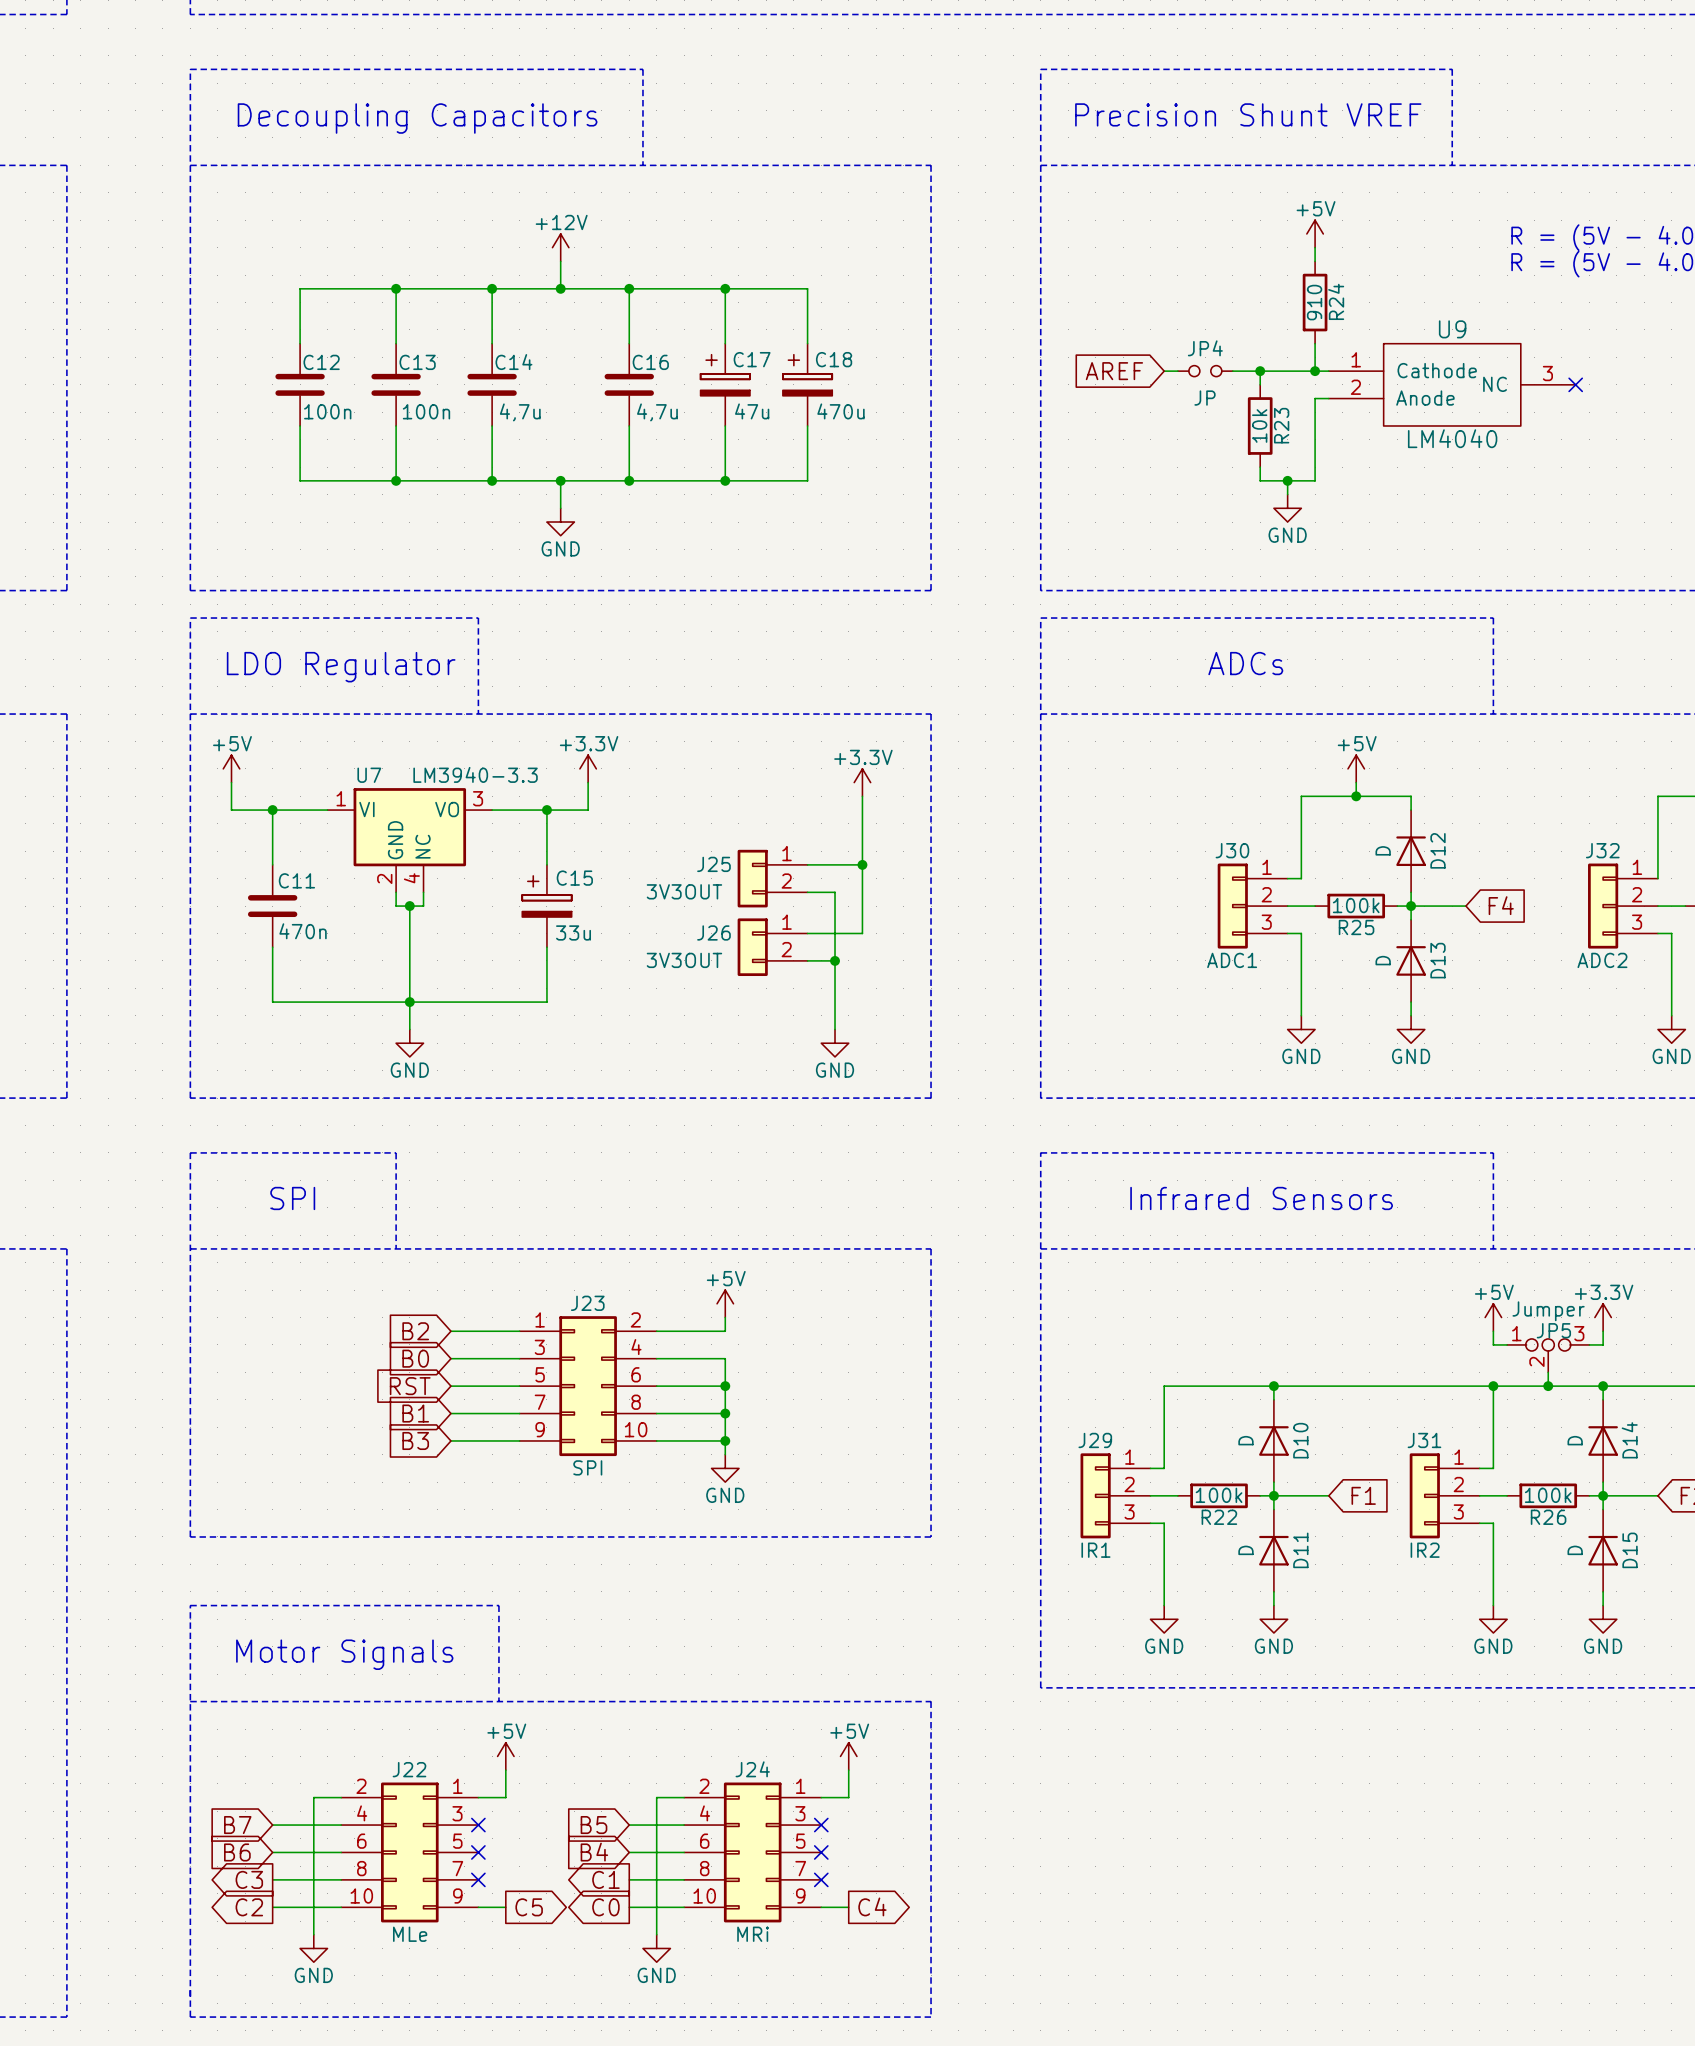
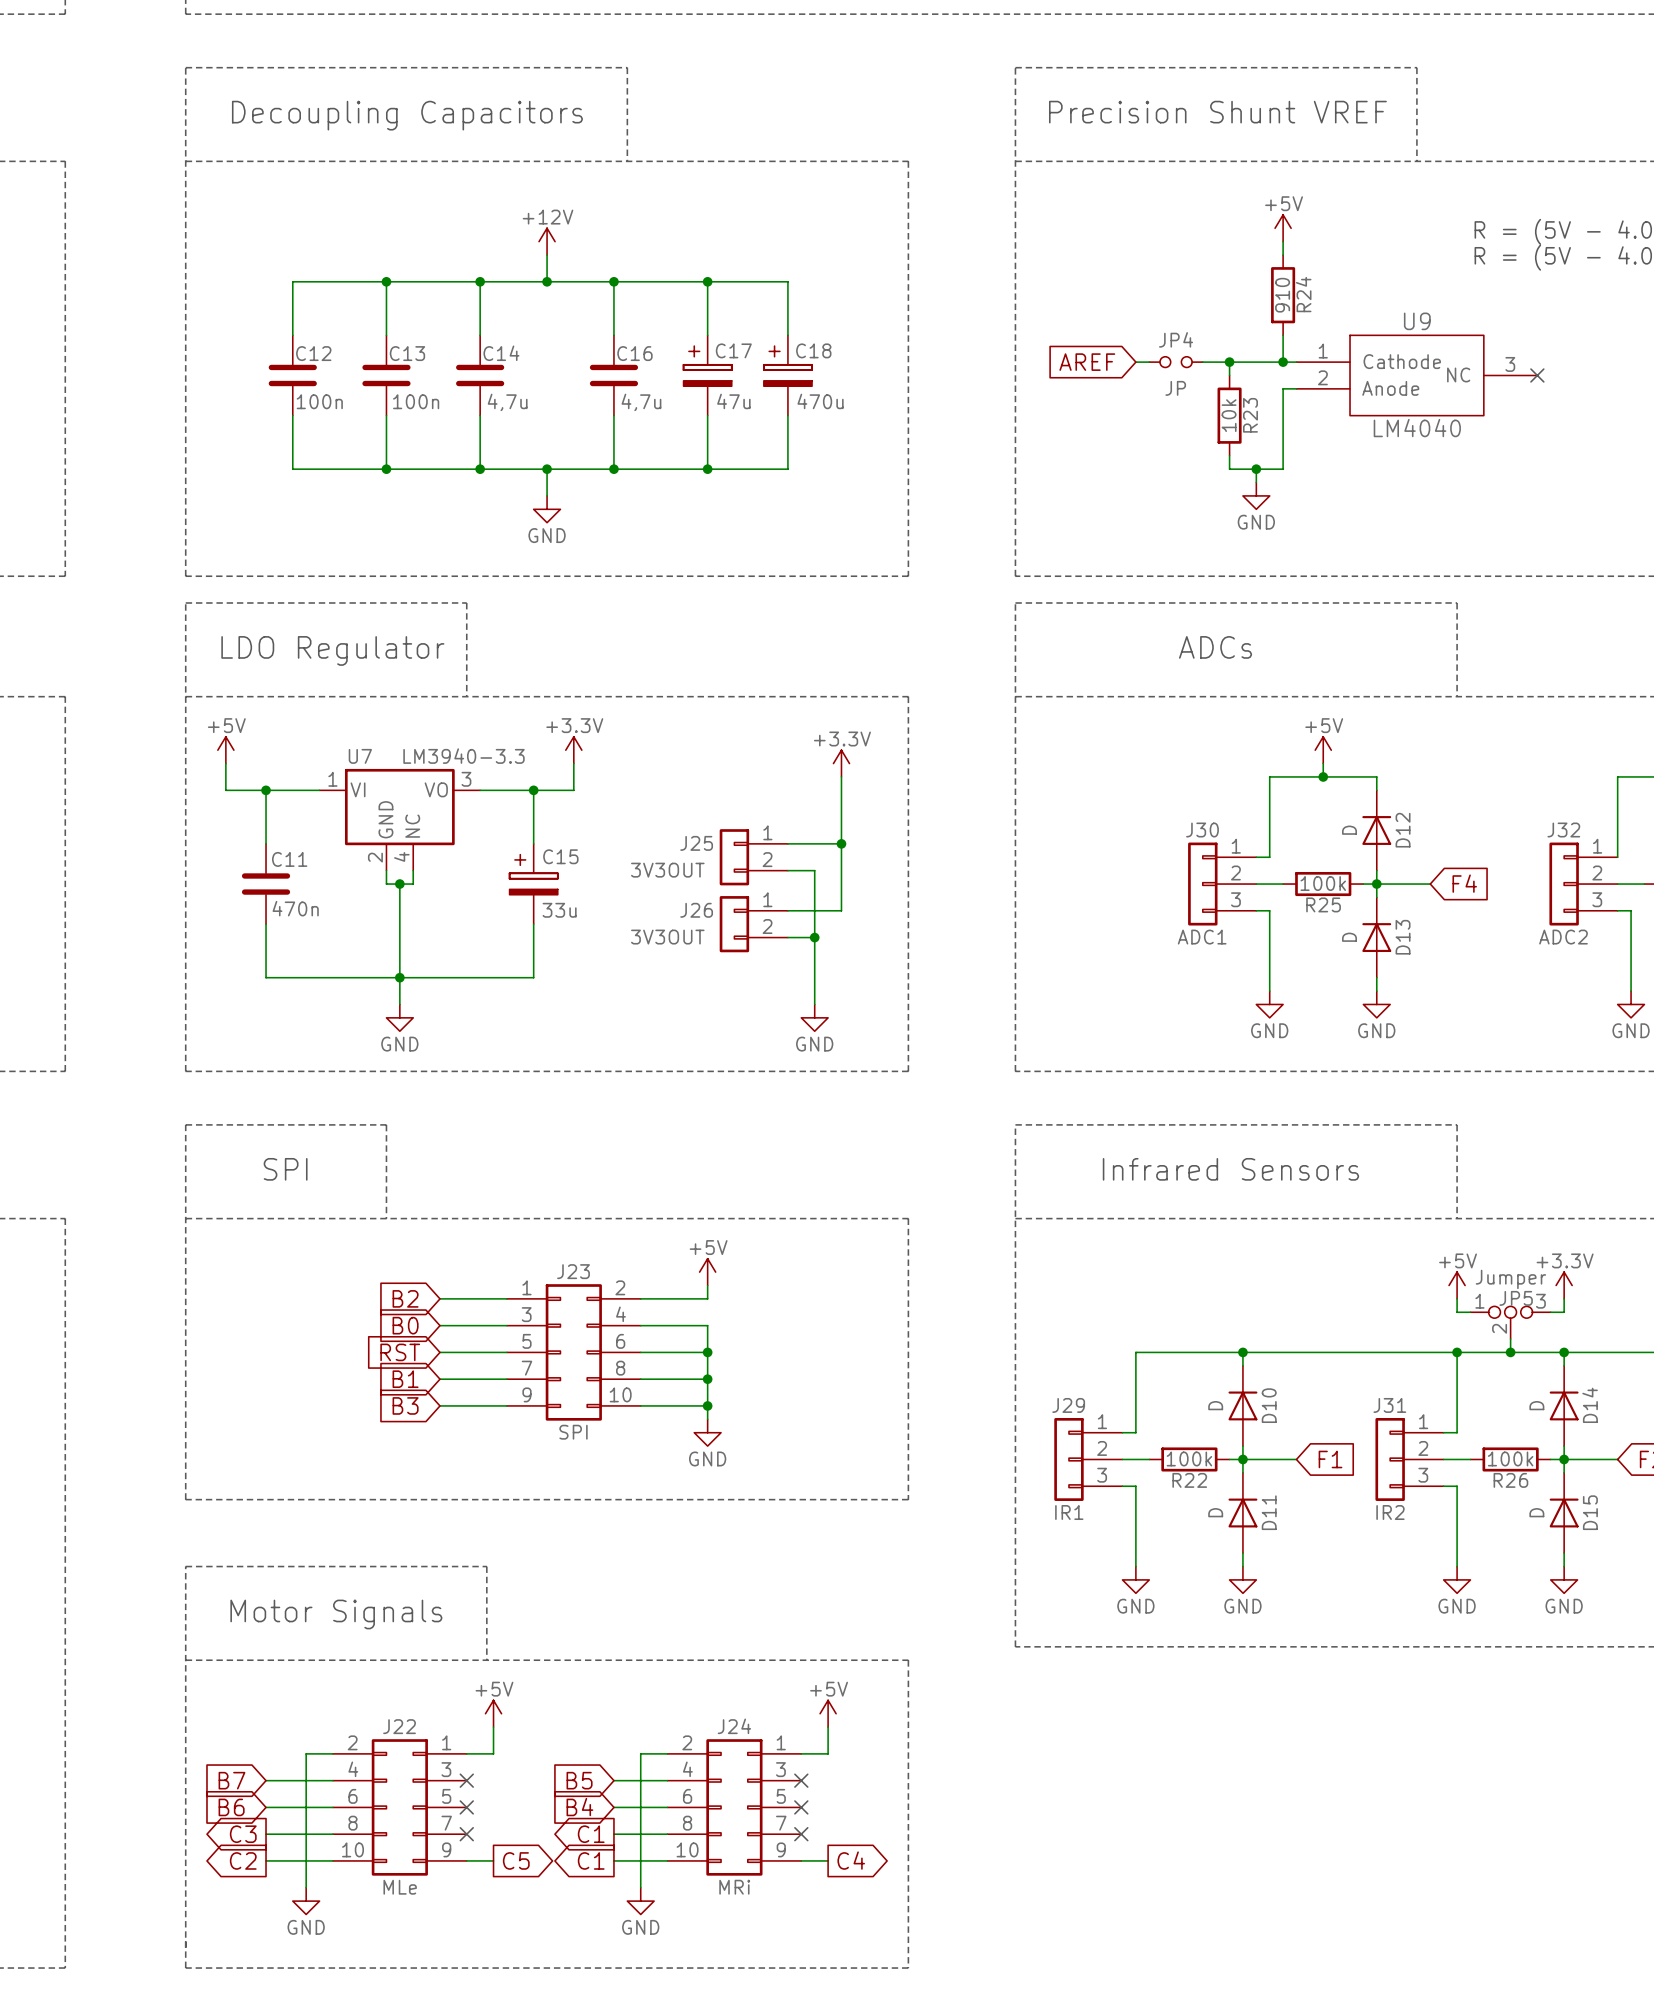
global label: C0 (605, 1907) -> C1 (591, 1860)

